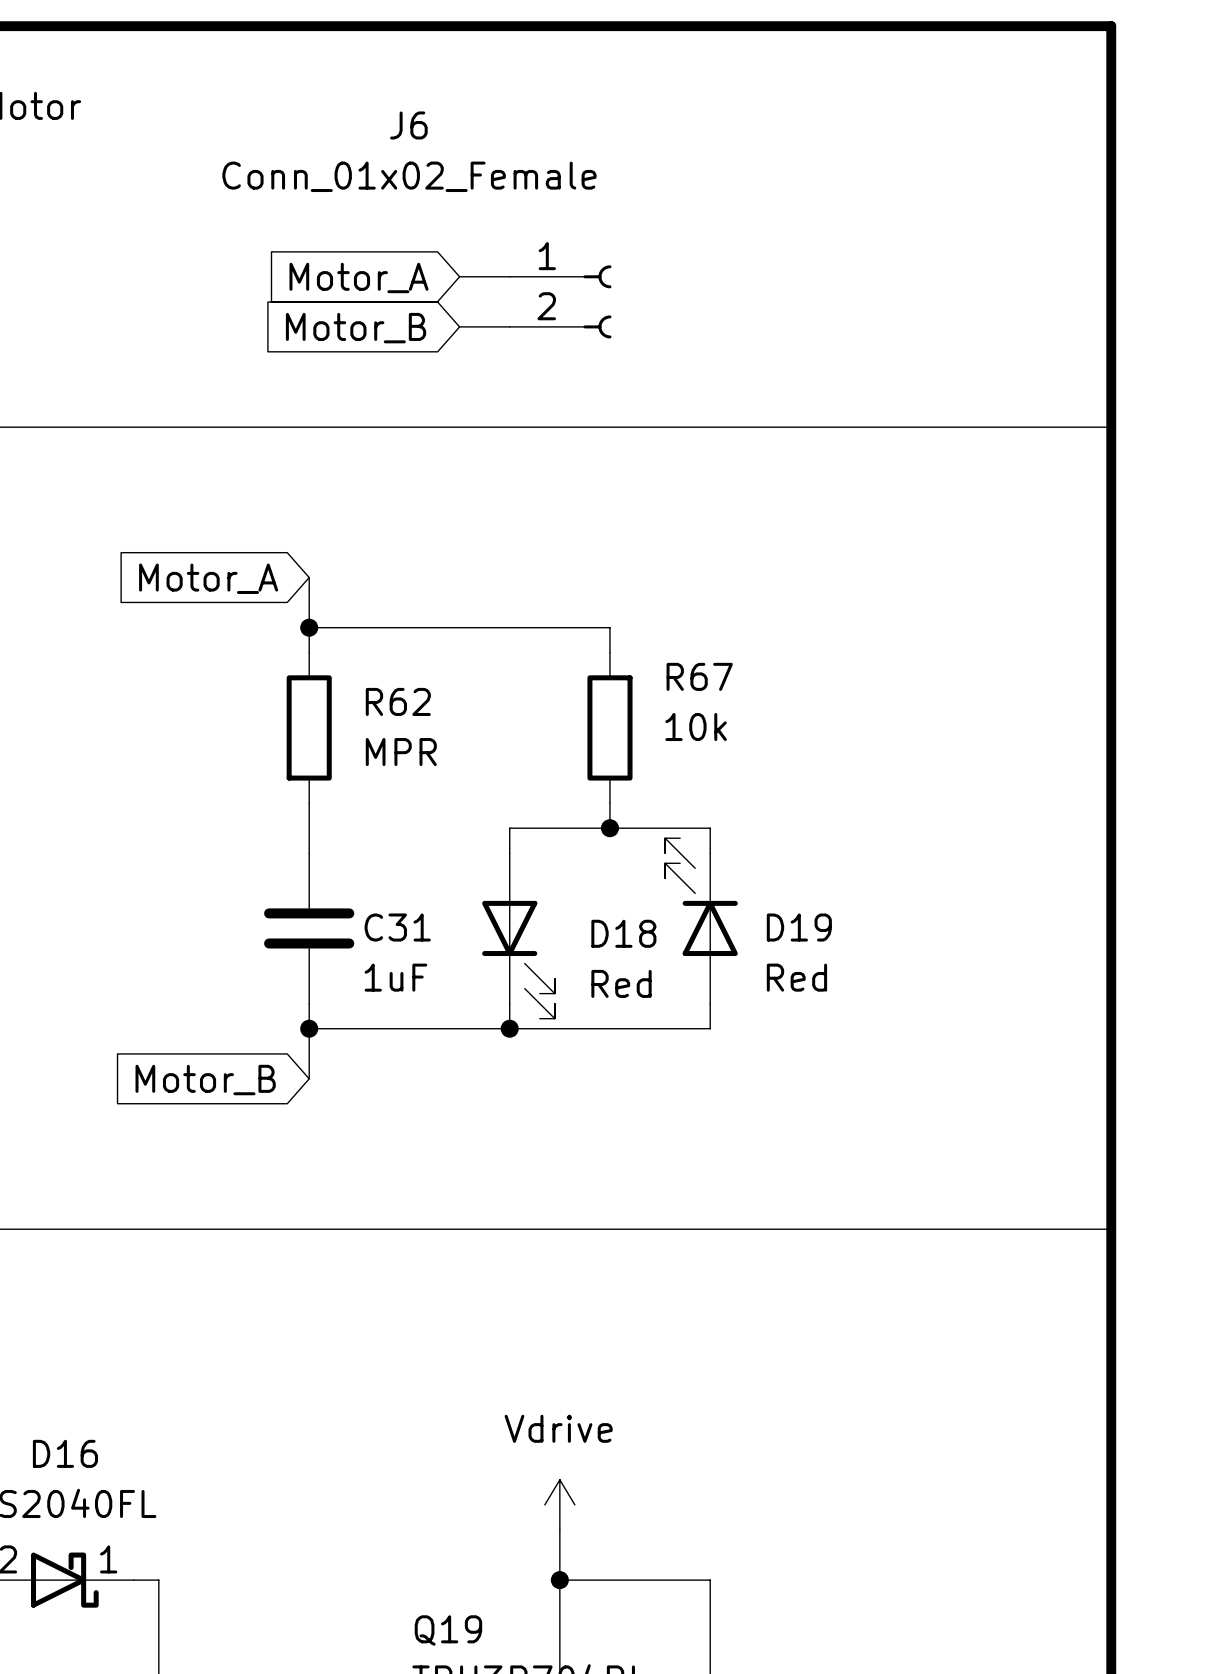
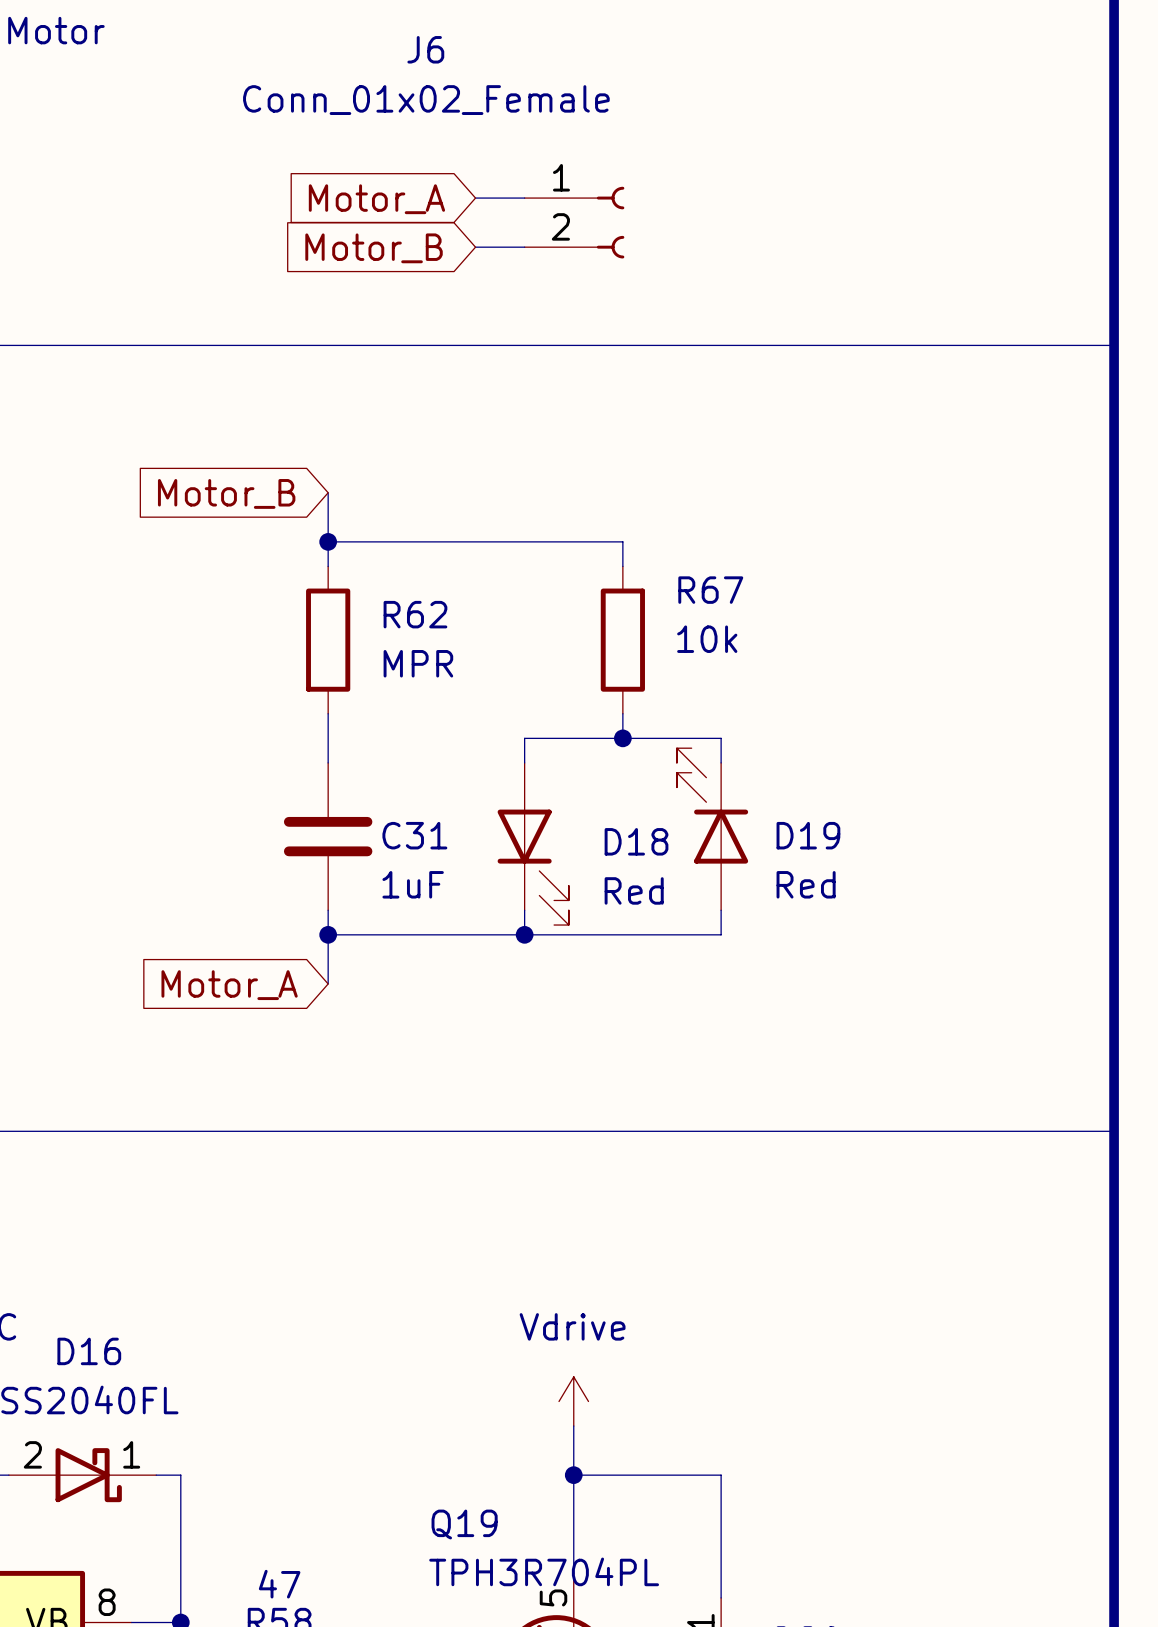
global label: Motor_A (208, 578) -> Motor_B (226, 493)
global label: Motor_B (205, 1080) -> Motor_A (229, 985)

